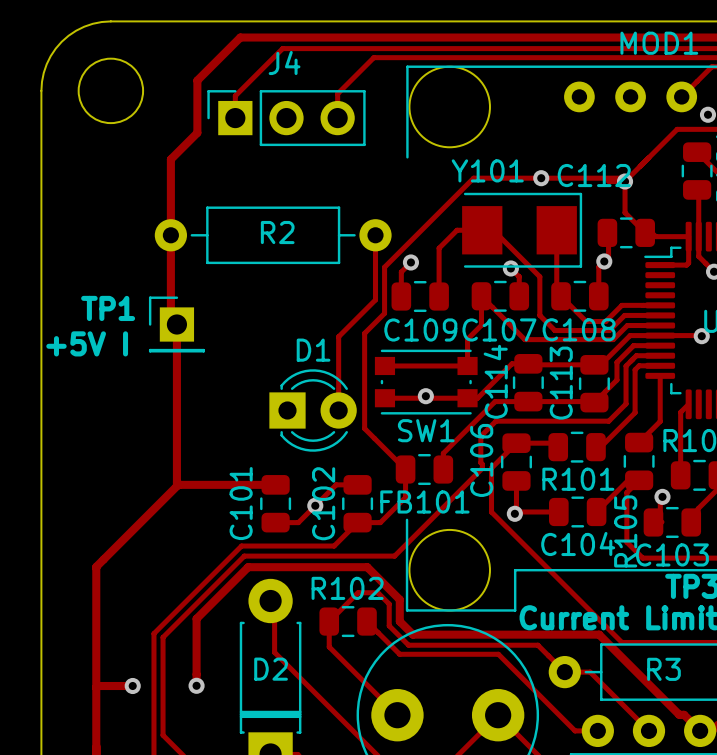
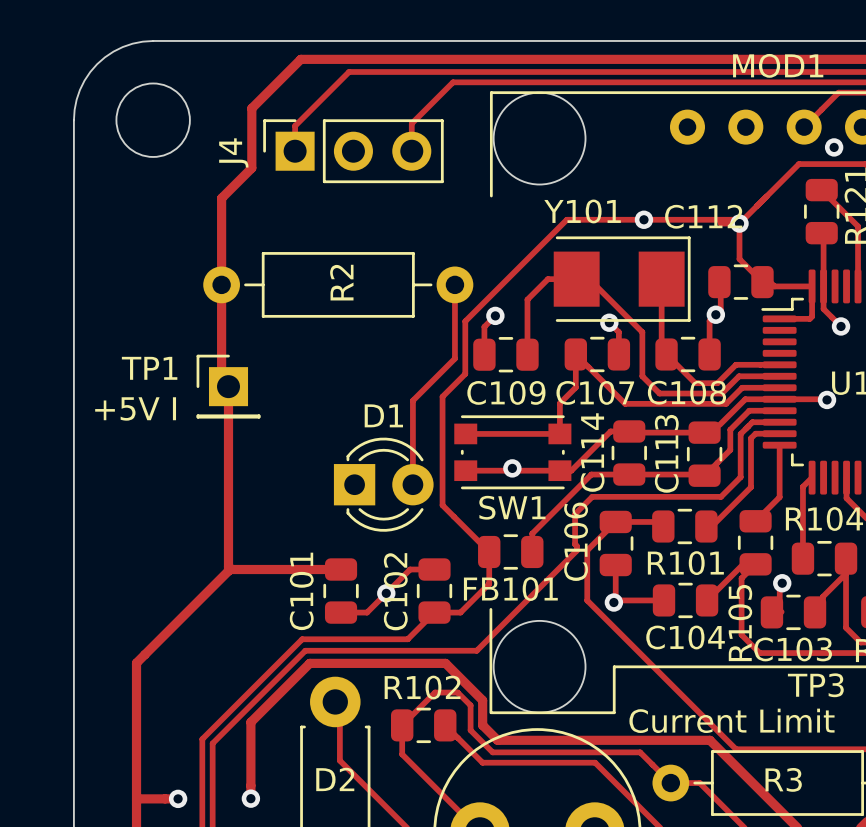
J4 name rotation: 0° (284, 62) -> 90° counterclockwise (233, 152)
J4 name position: J4 (284, 62) -> J4 (233, 152)
R2 name rotation: 0° (277, 232) -> 90° counterclockwise (341, 282)

